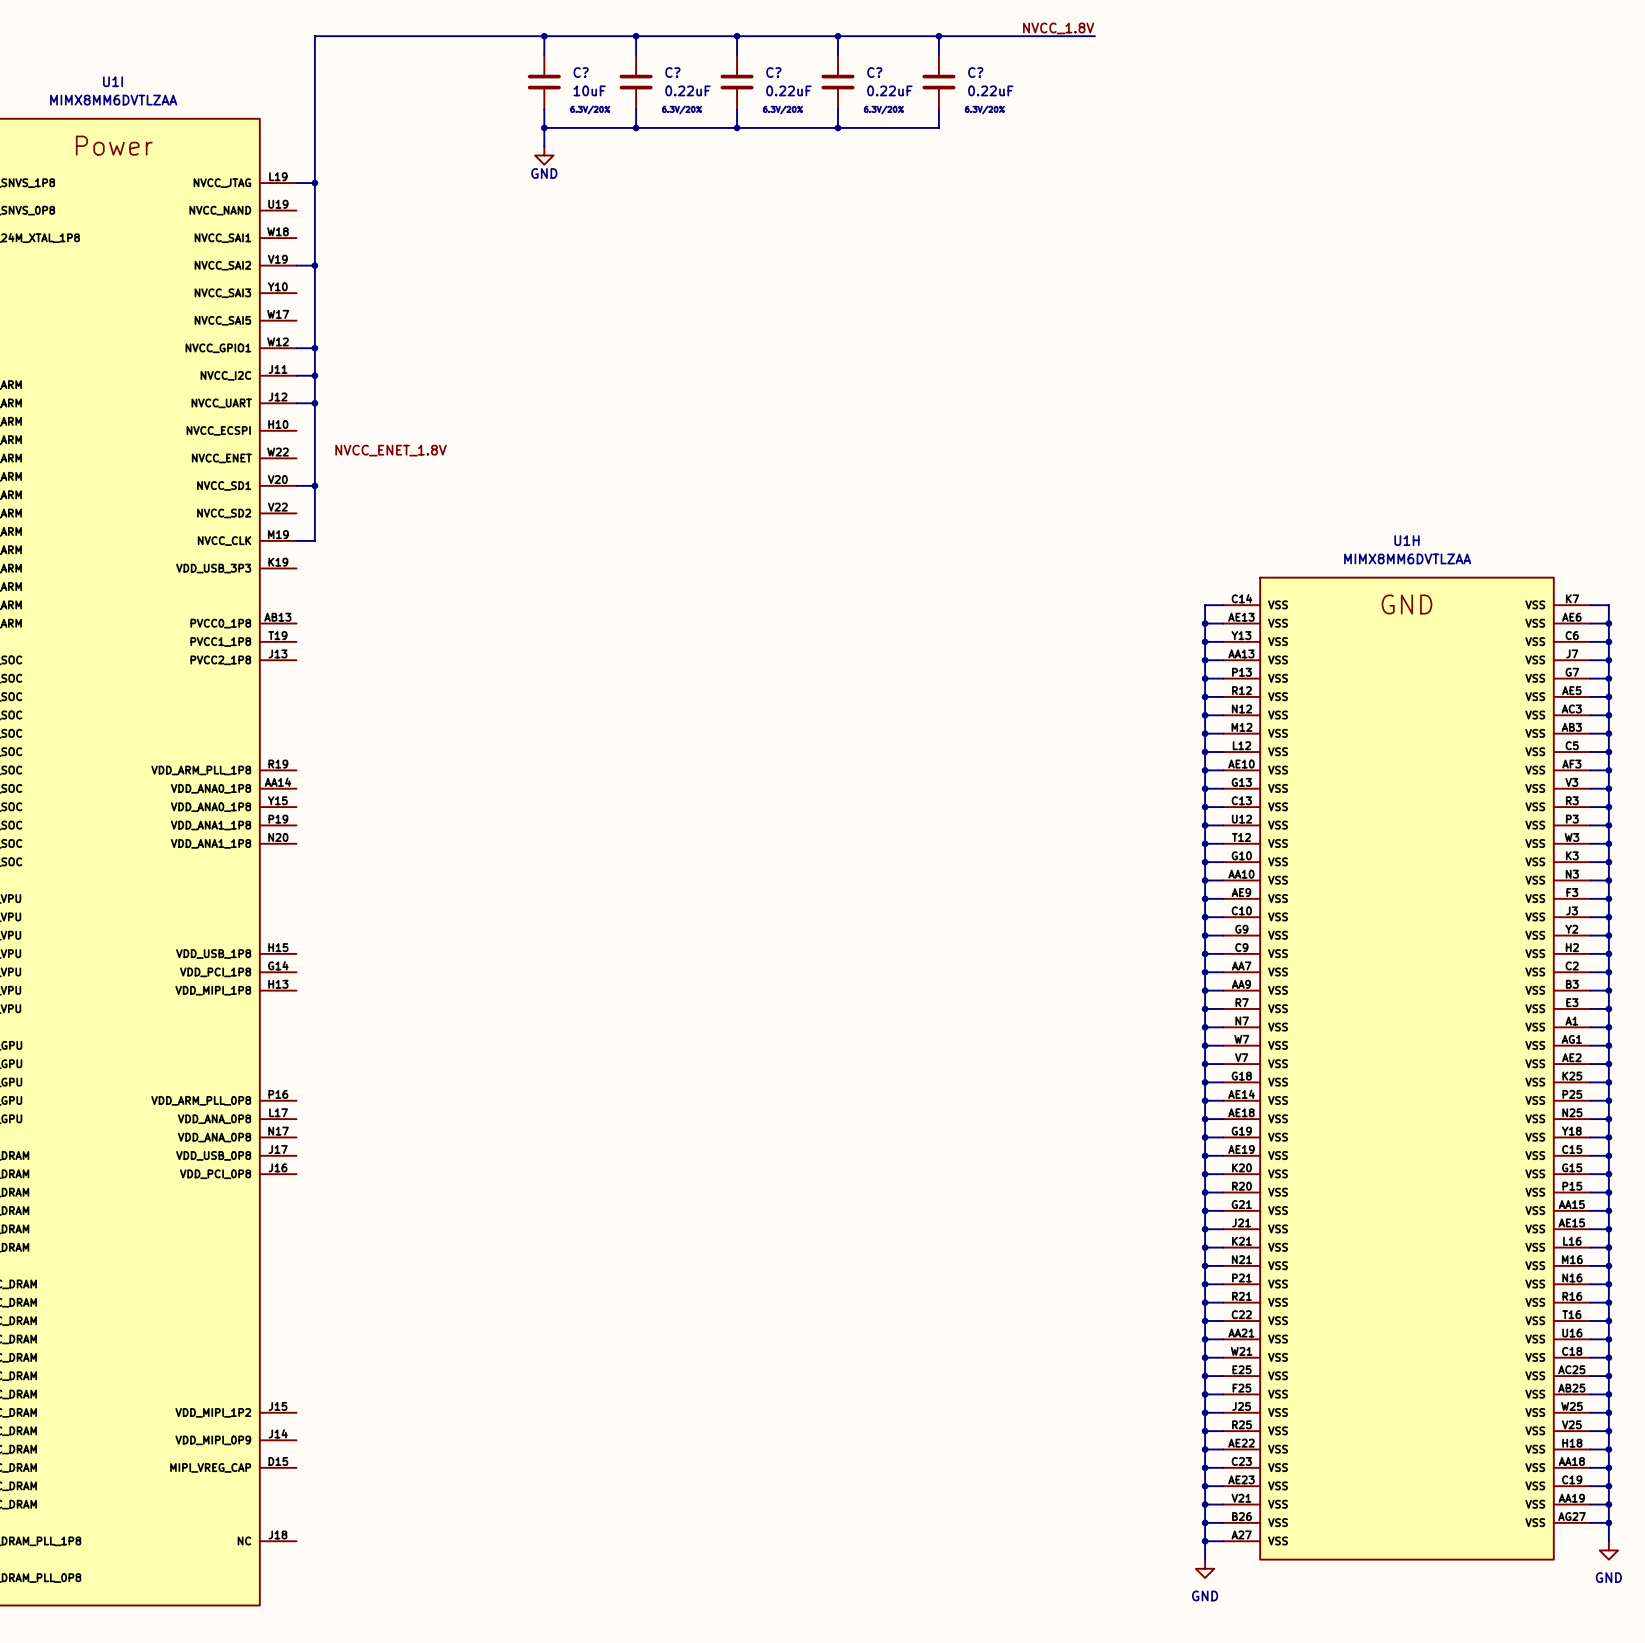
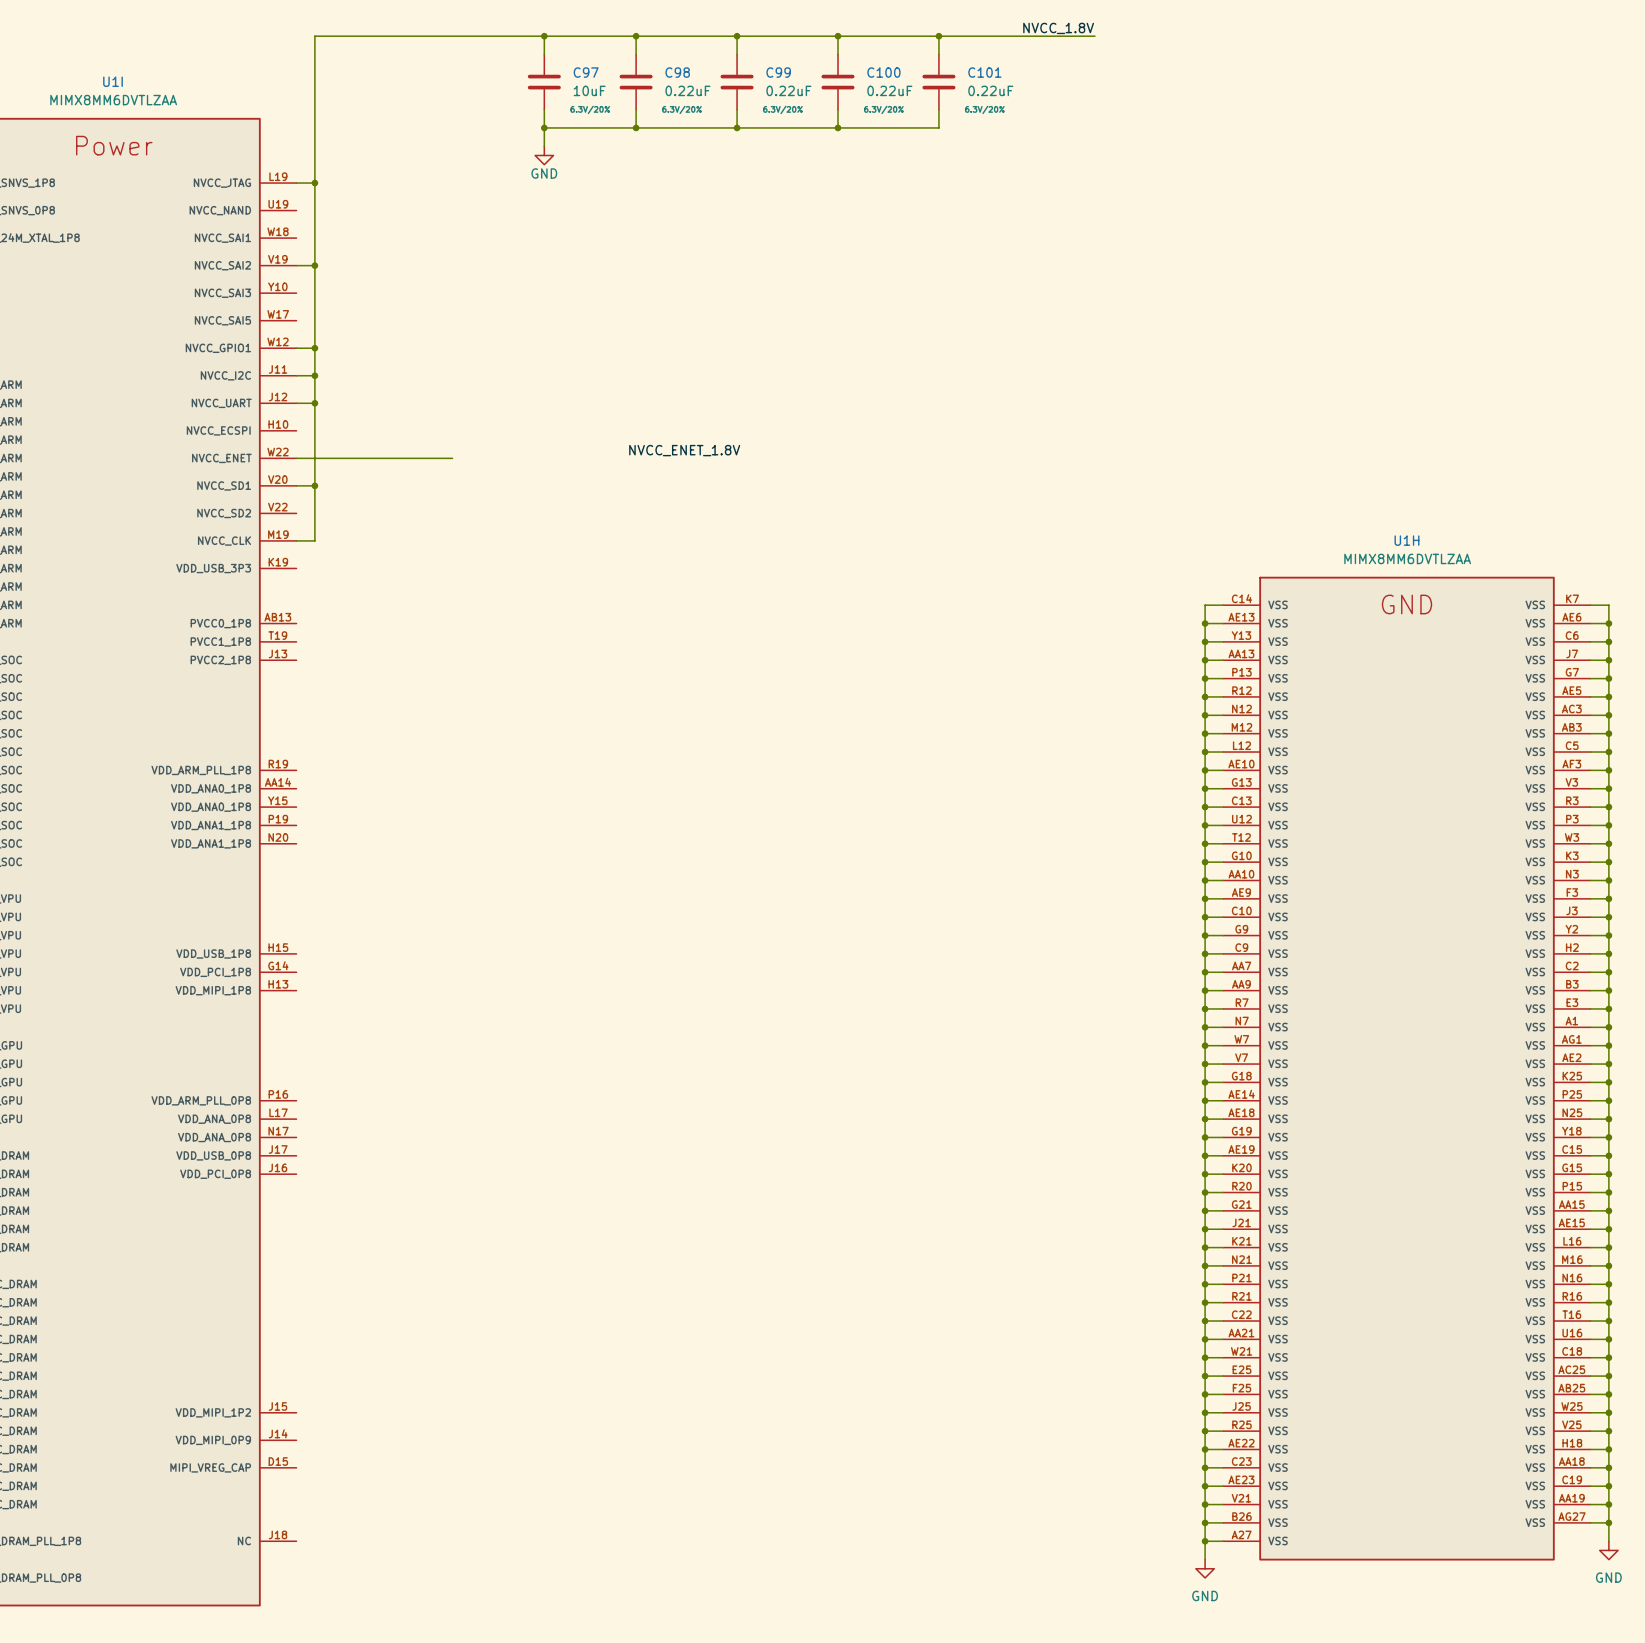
C? name: C? (581, 72) -> C97 (586, 72)
C? name: C? (672, 72) -> C98 (677, 72)
C? name: C? (773, 72) -> C99 (778, 72)
C? name: C? (874, 72) -> C100 (883, 72)
C? name: C? (975, 72) -> C101 (984, 72)
label: NVCC_ENET_1.8V (391, 450) -> none
label: none -> NVCC_ENET_1.8V (684, 450)
wire: none -> (296, 458) (452, 458)

